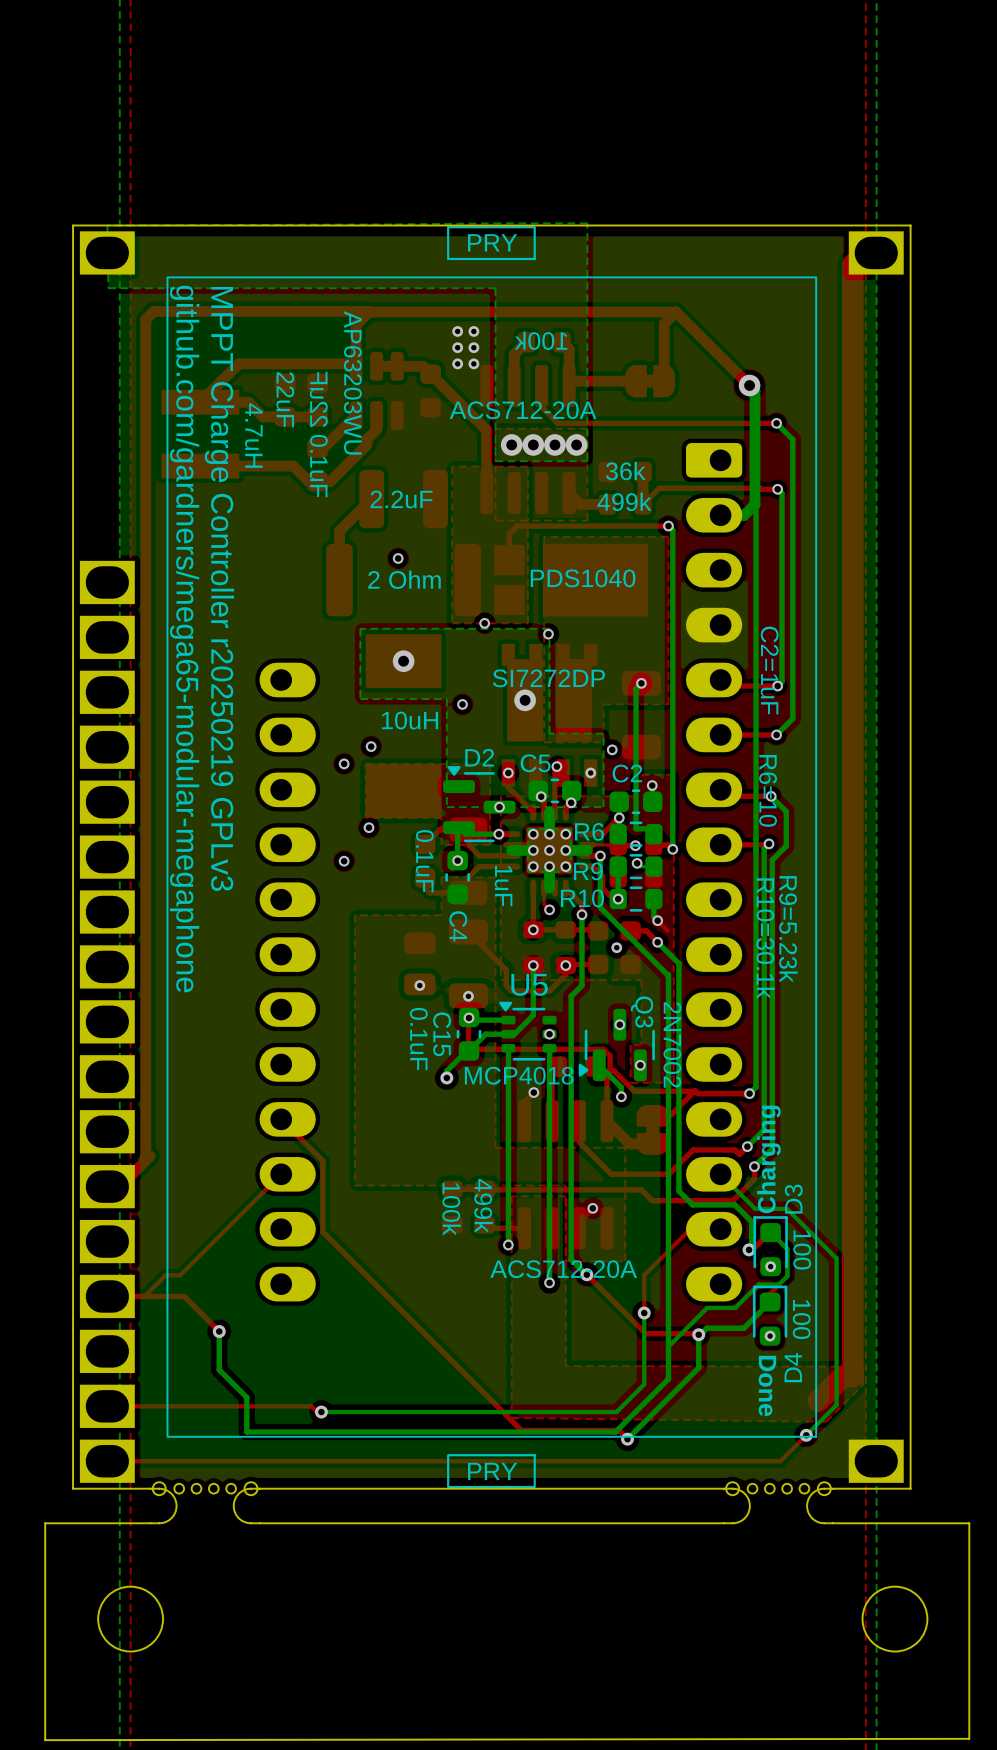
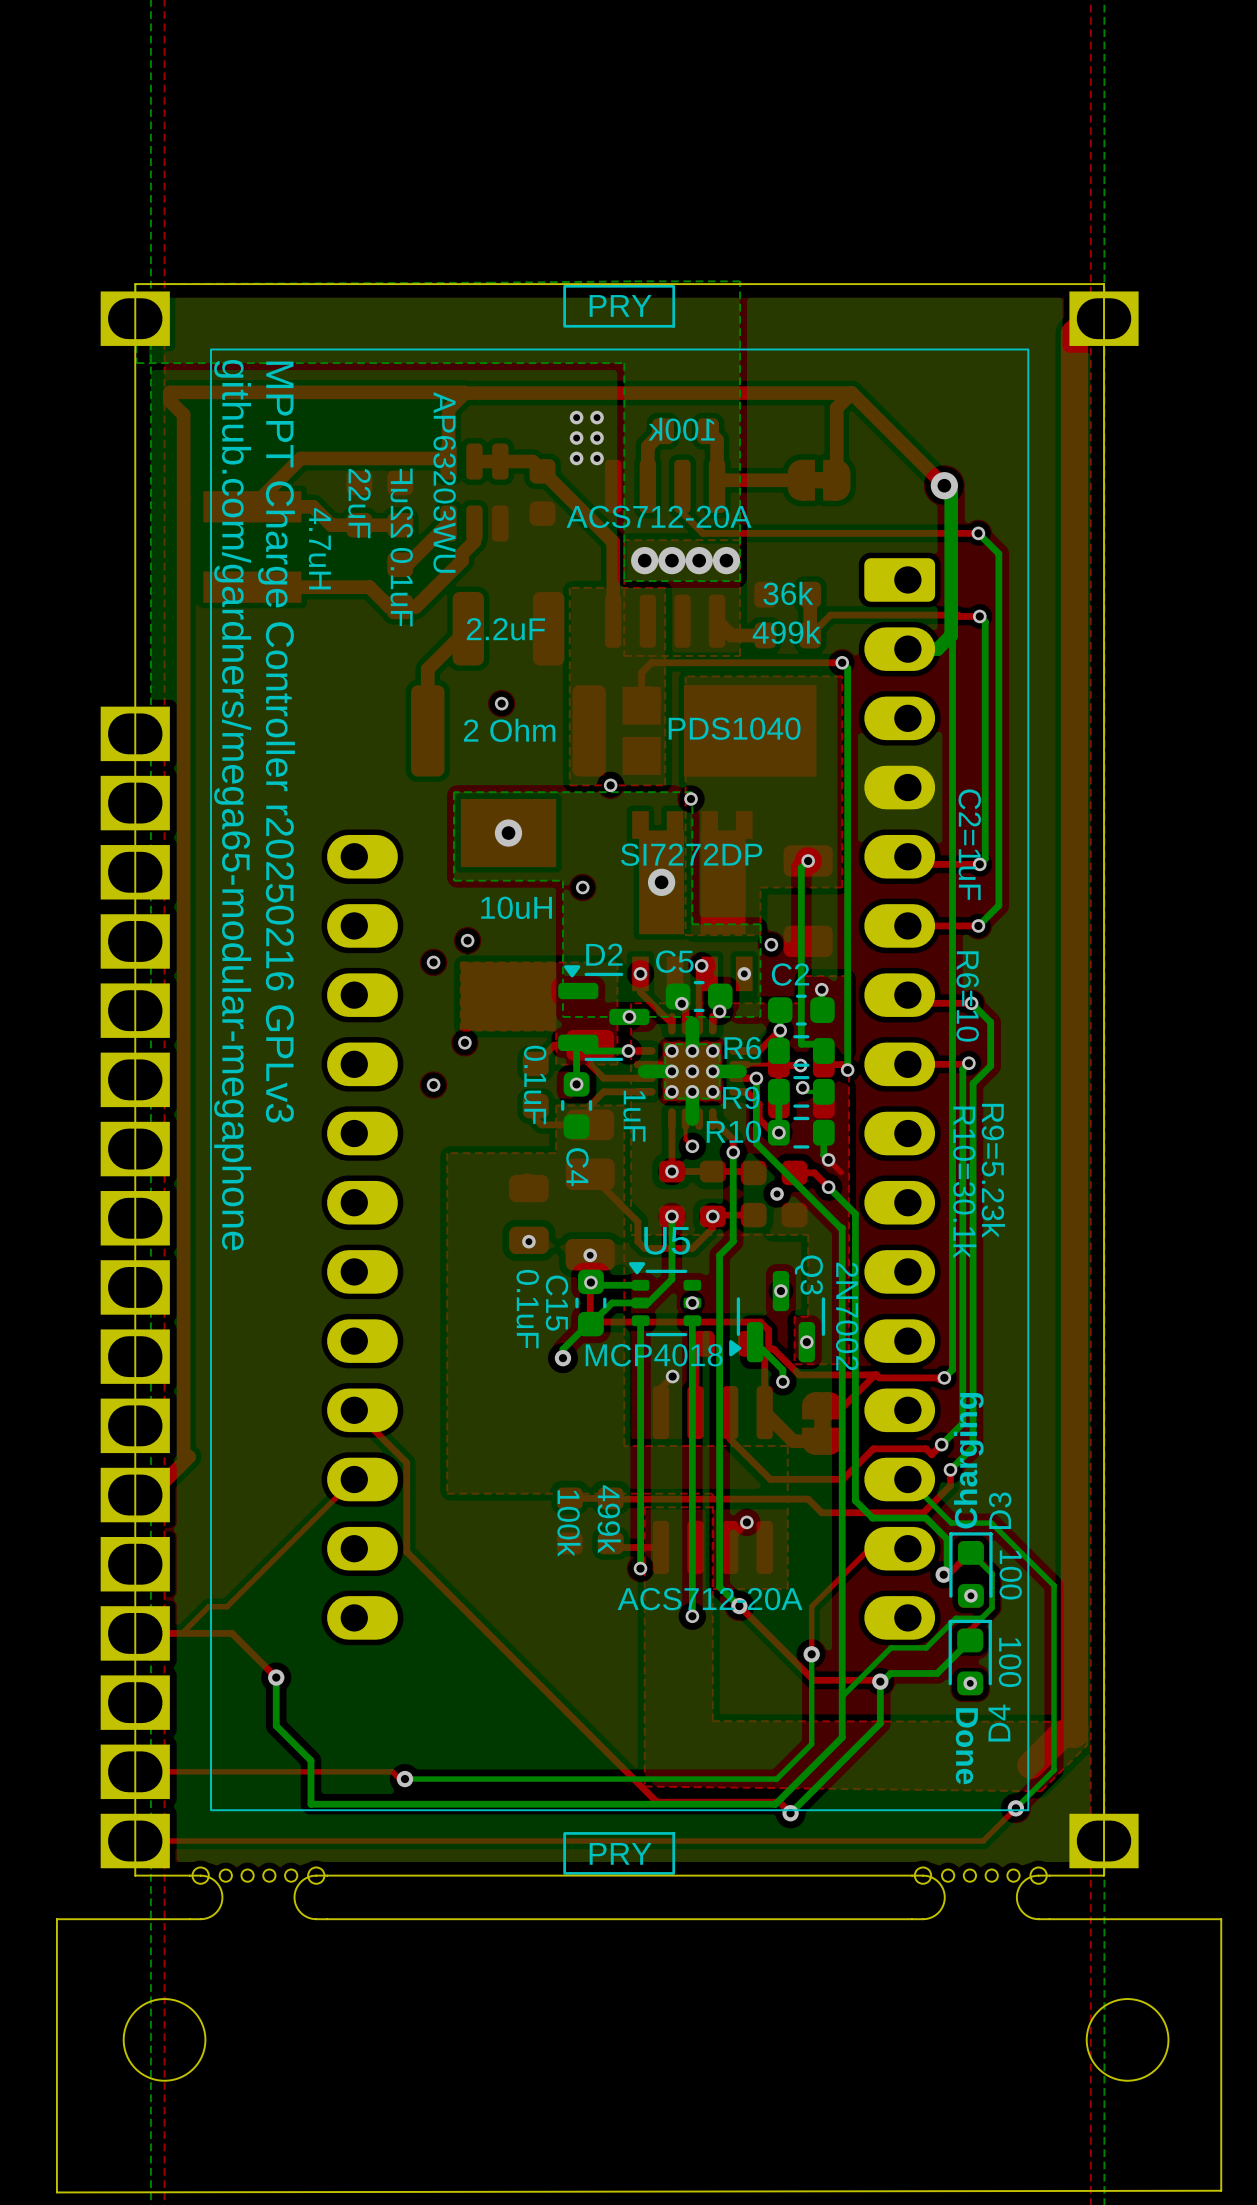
part footprint: [72, 224, 912, 1524] -> [100, 283, 1139, 1920]
top track: (153, 311) (145, 319) (145, 329) -> (193, 392) (170, 392) (170, 401) (183, 414)
text: MPPT Charge Controller r20250219 GPLv3 (219, 588) -> MPPT Charge Controller r20250216 GPLv3 (276, 742)

